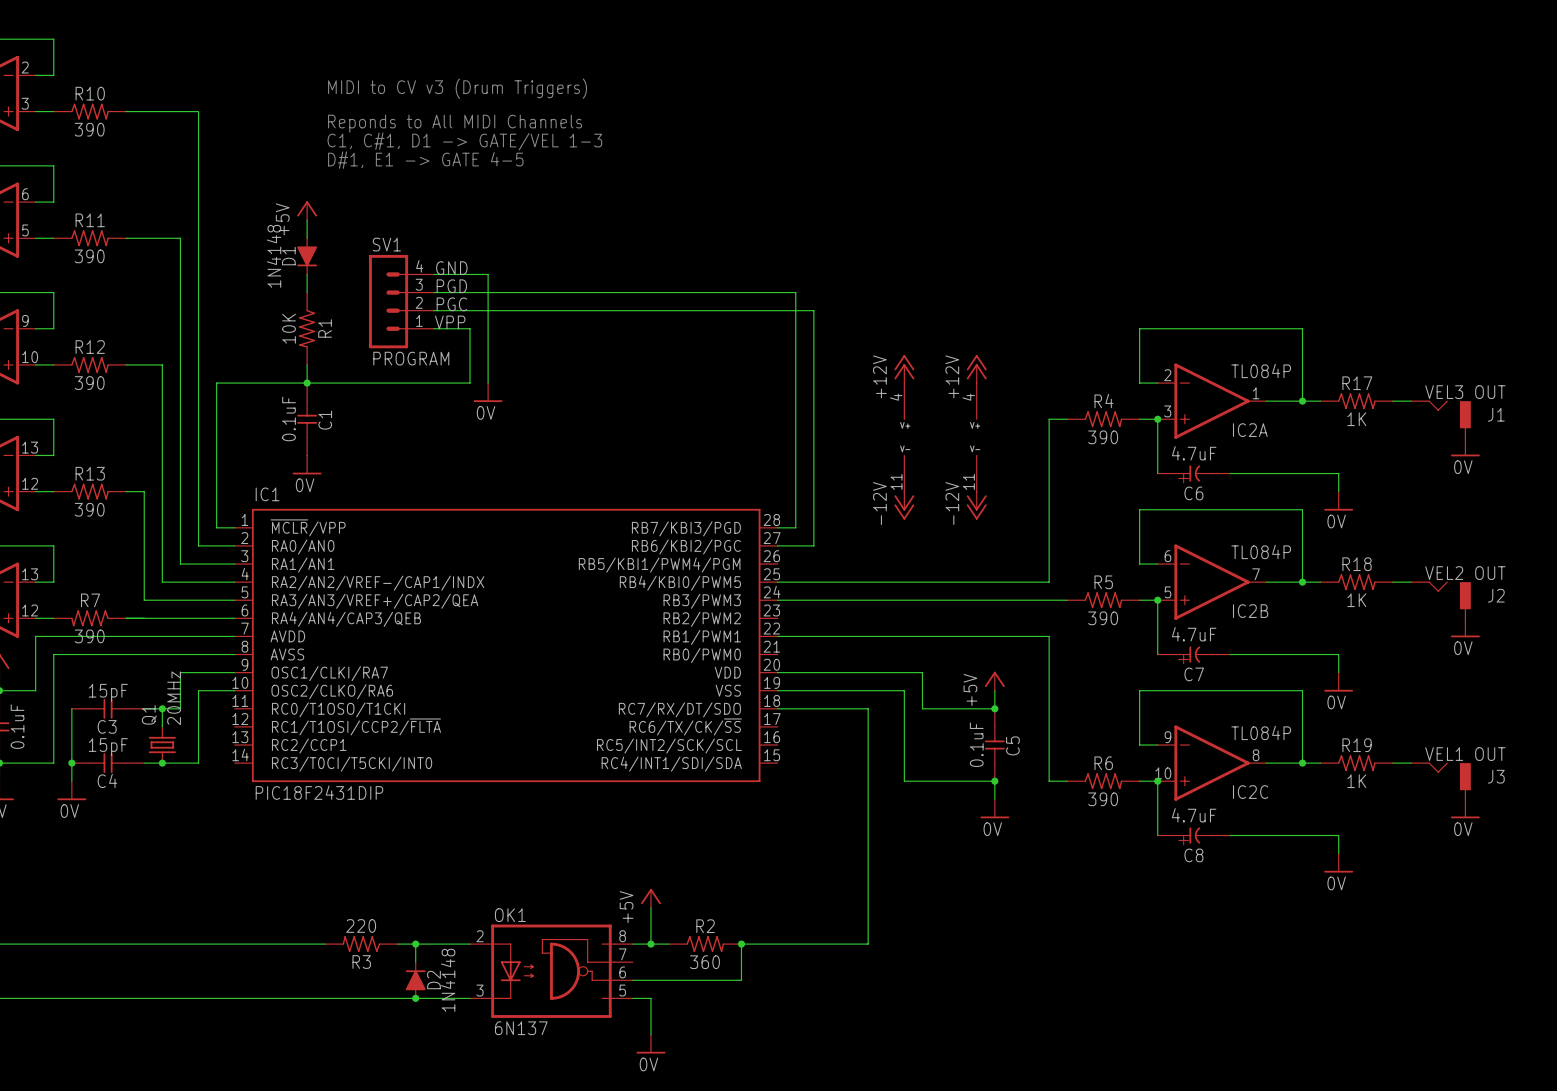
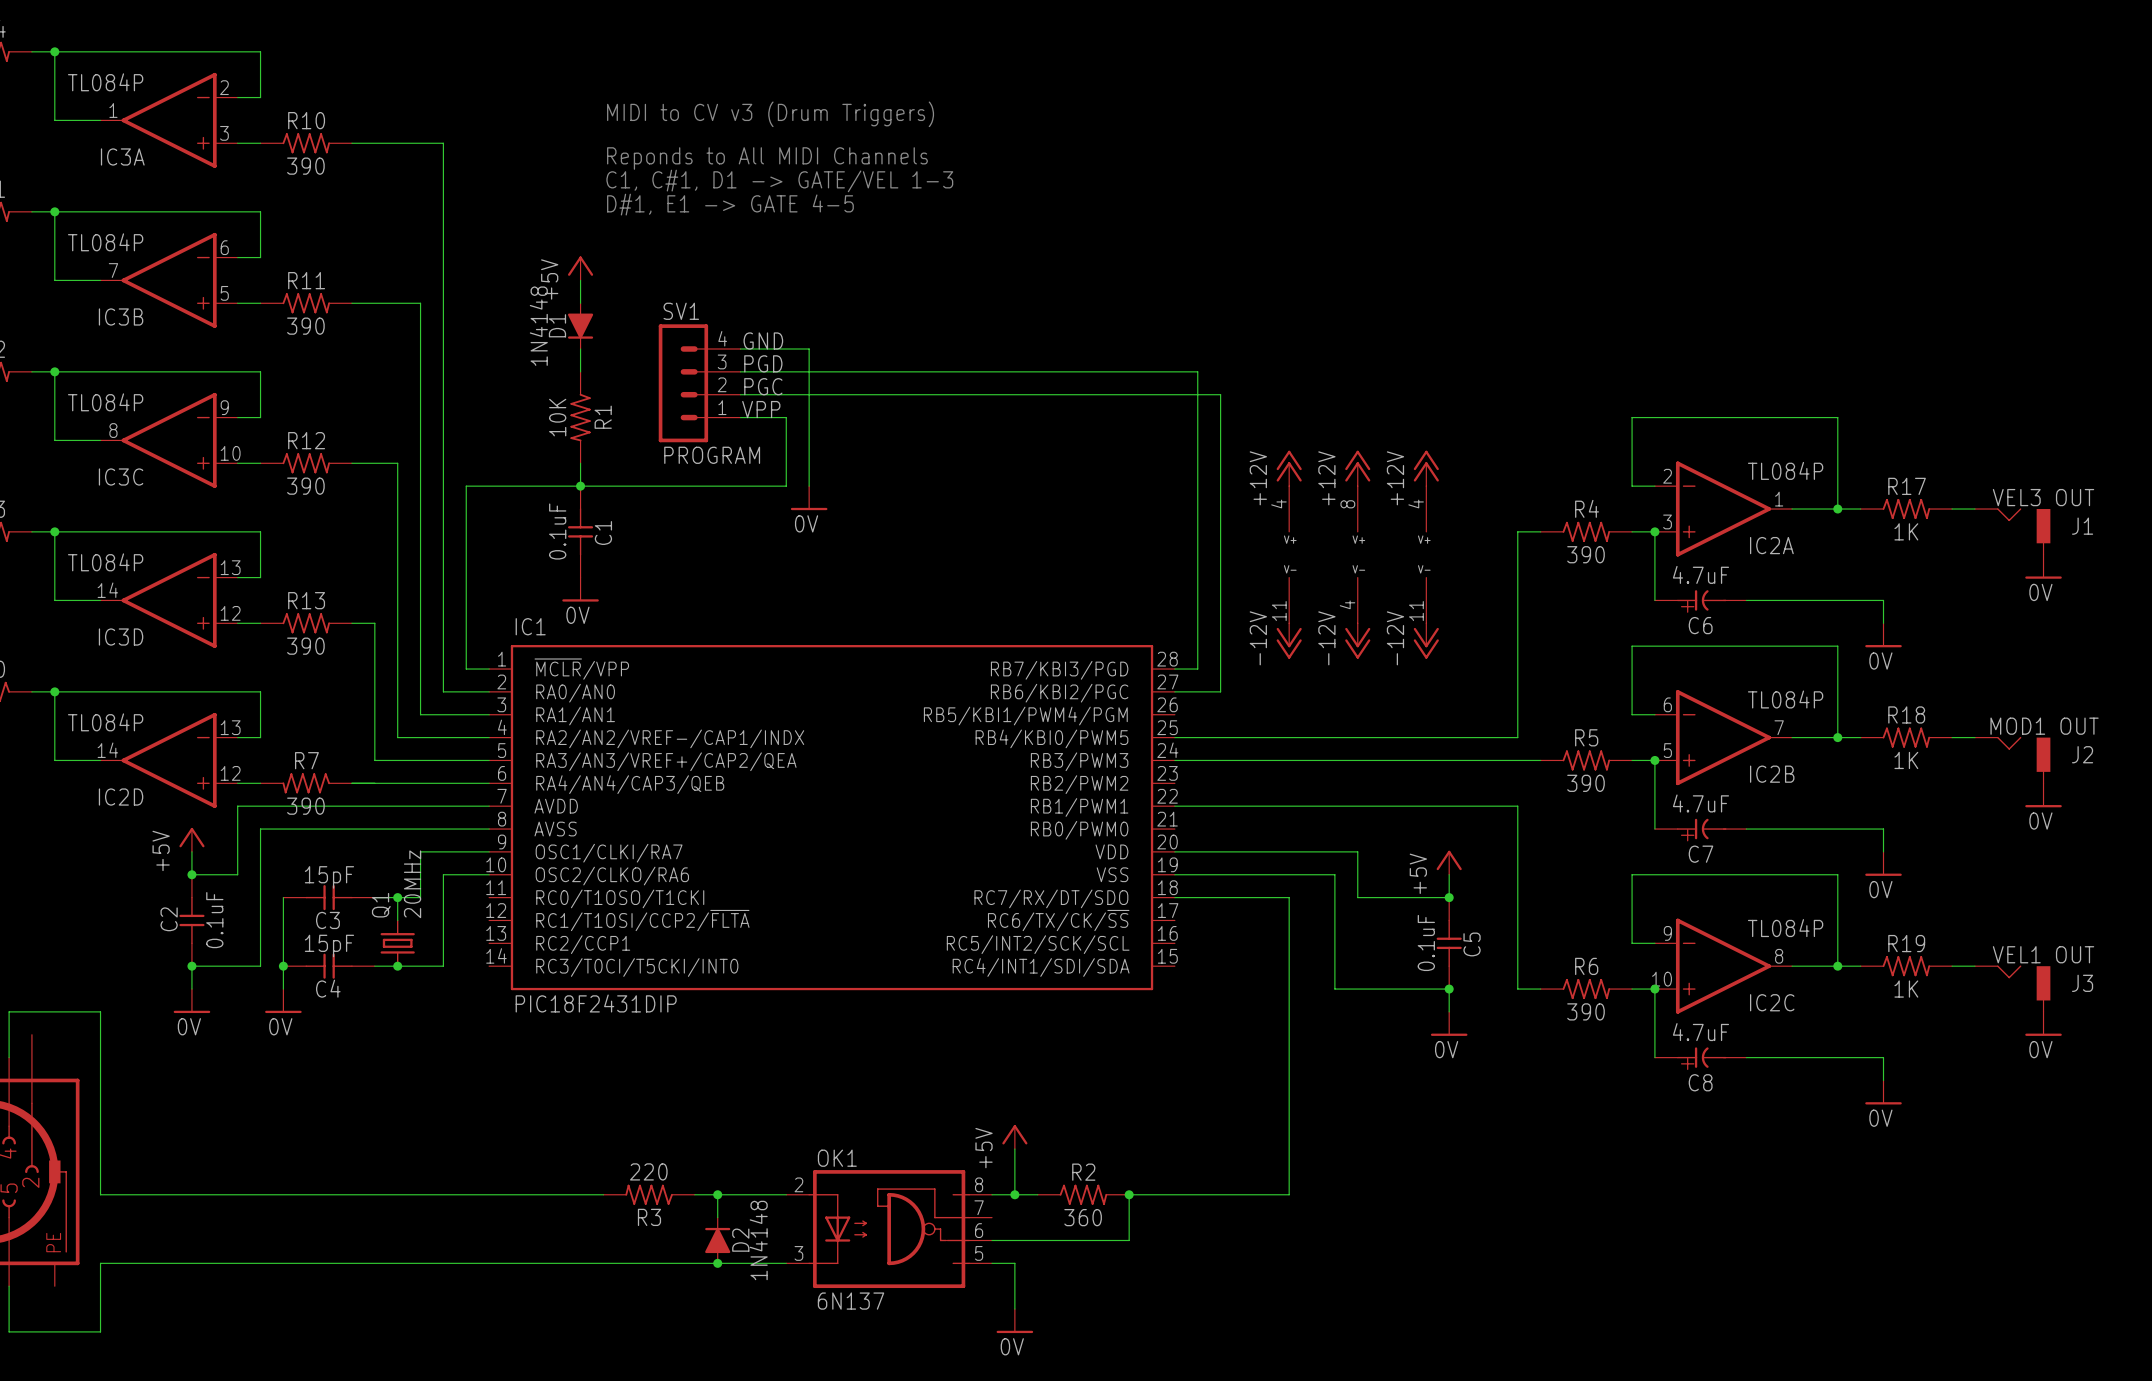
power symbol: none -> +12V (1289, 468)
power symbol: +12V (904, 369) -> none
power symbol: none -> +12V (1357, 468)
part position: (904, 437) -> (1289, 554)
part: none -> (1357, 554)
power symbol: none -> -12V (1289, 641)
power symbol: -12V (904, 505) -> none
power symbol: none -> -12V (1357, 641)
J2 value: VEL2 OUT (1465, 573) -> MOD1 OUT (2044, 726)

